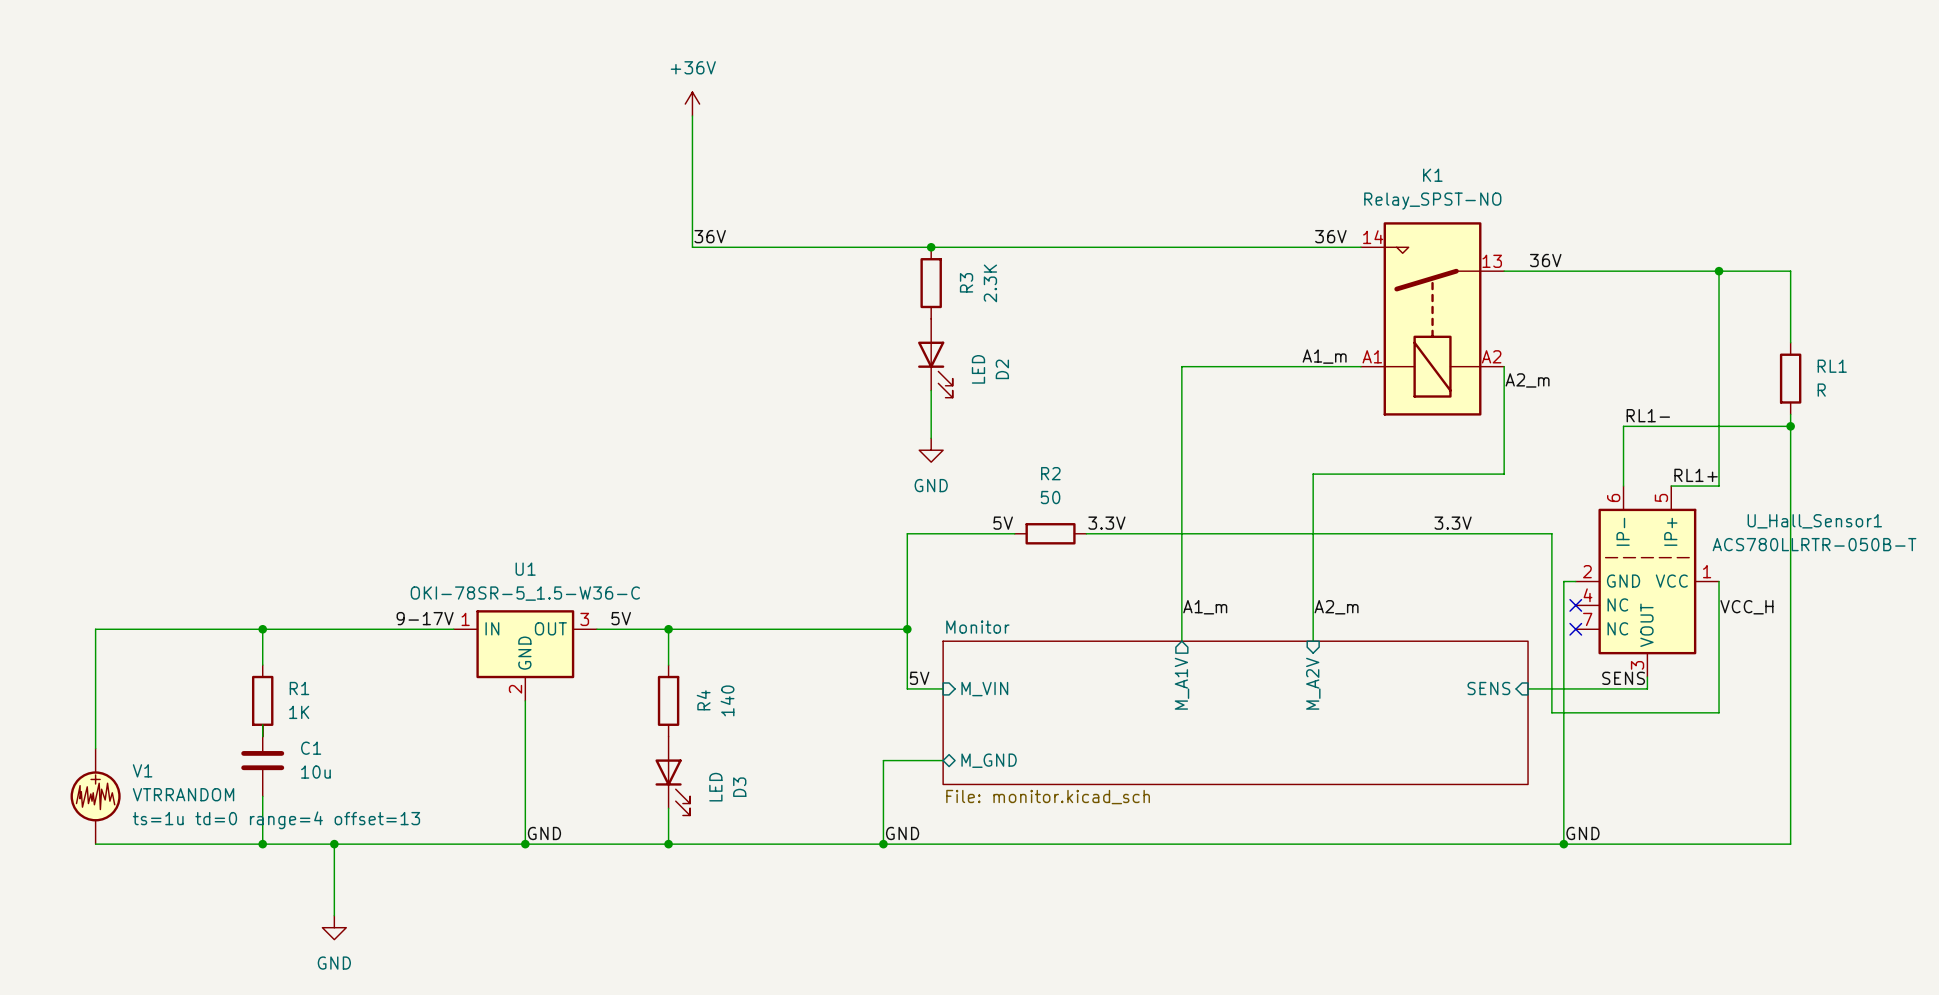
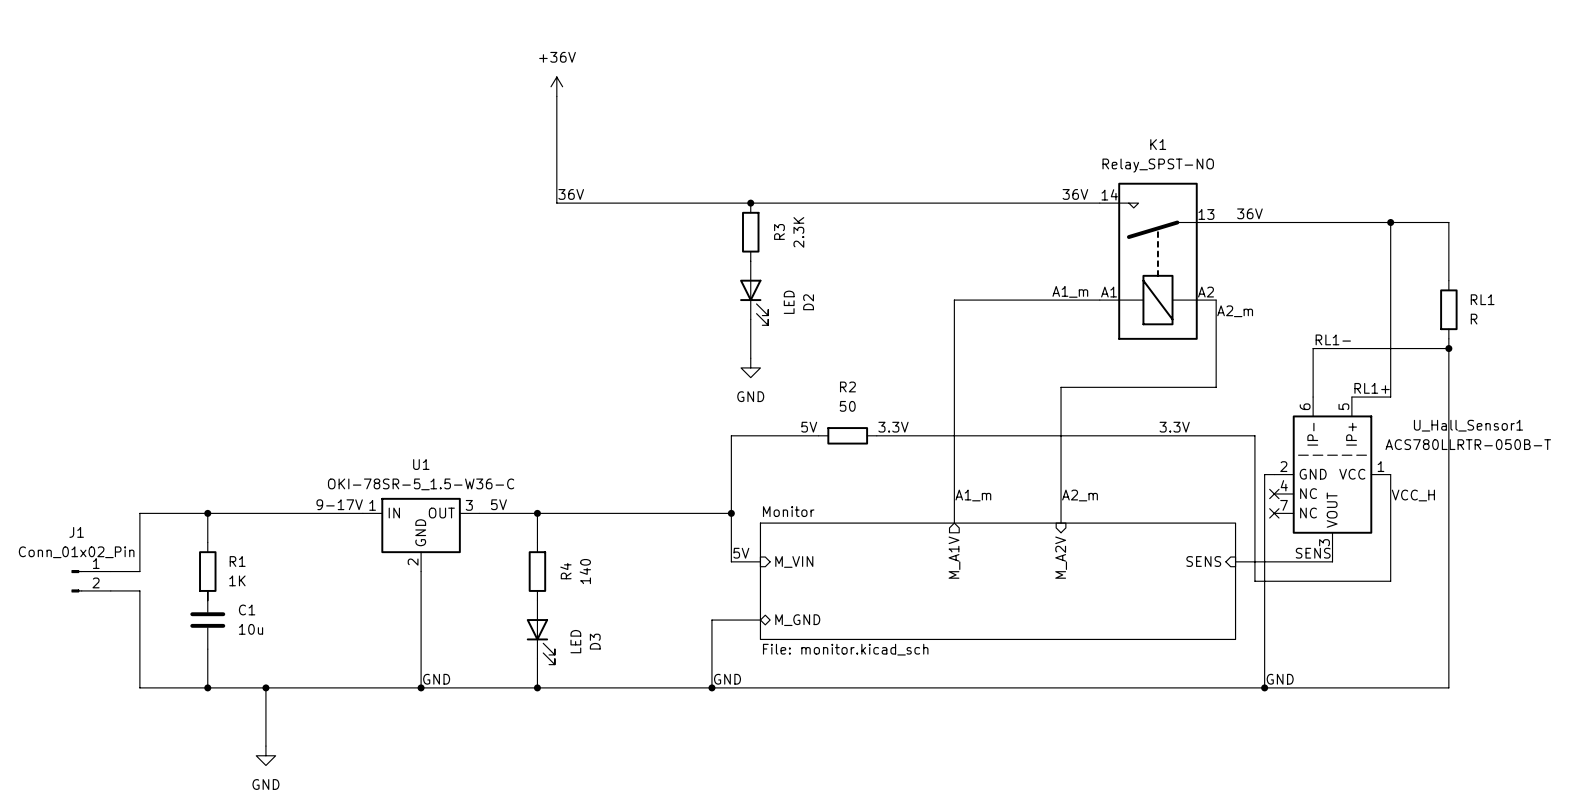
wire: (179, 629) (95, 629) (95, 748) -> (139, 513) (139, 571) (110, 571)
J1: none -> Conn_01x02_Pin (91, 581)
V1: VTRRANDOM (95, 796) -> none
wire: (95, 844) (179, 844) -> (110, 590) (139, 590) (139, 687)

